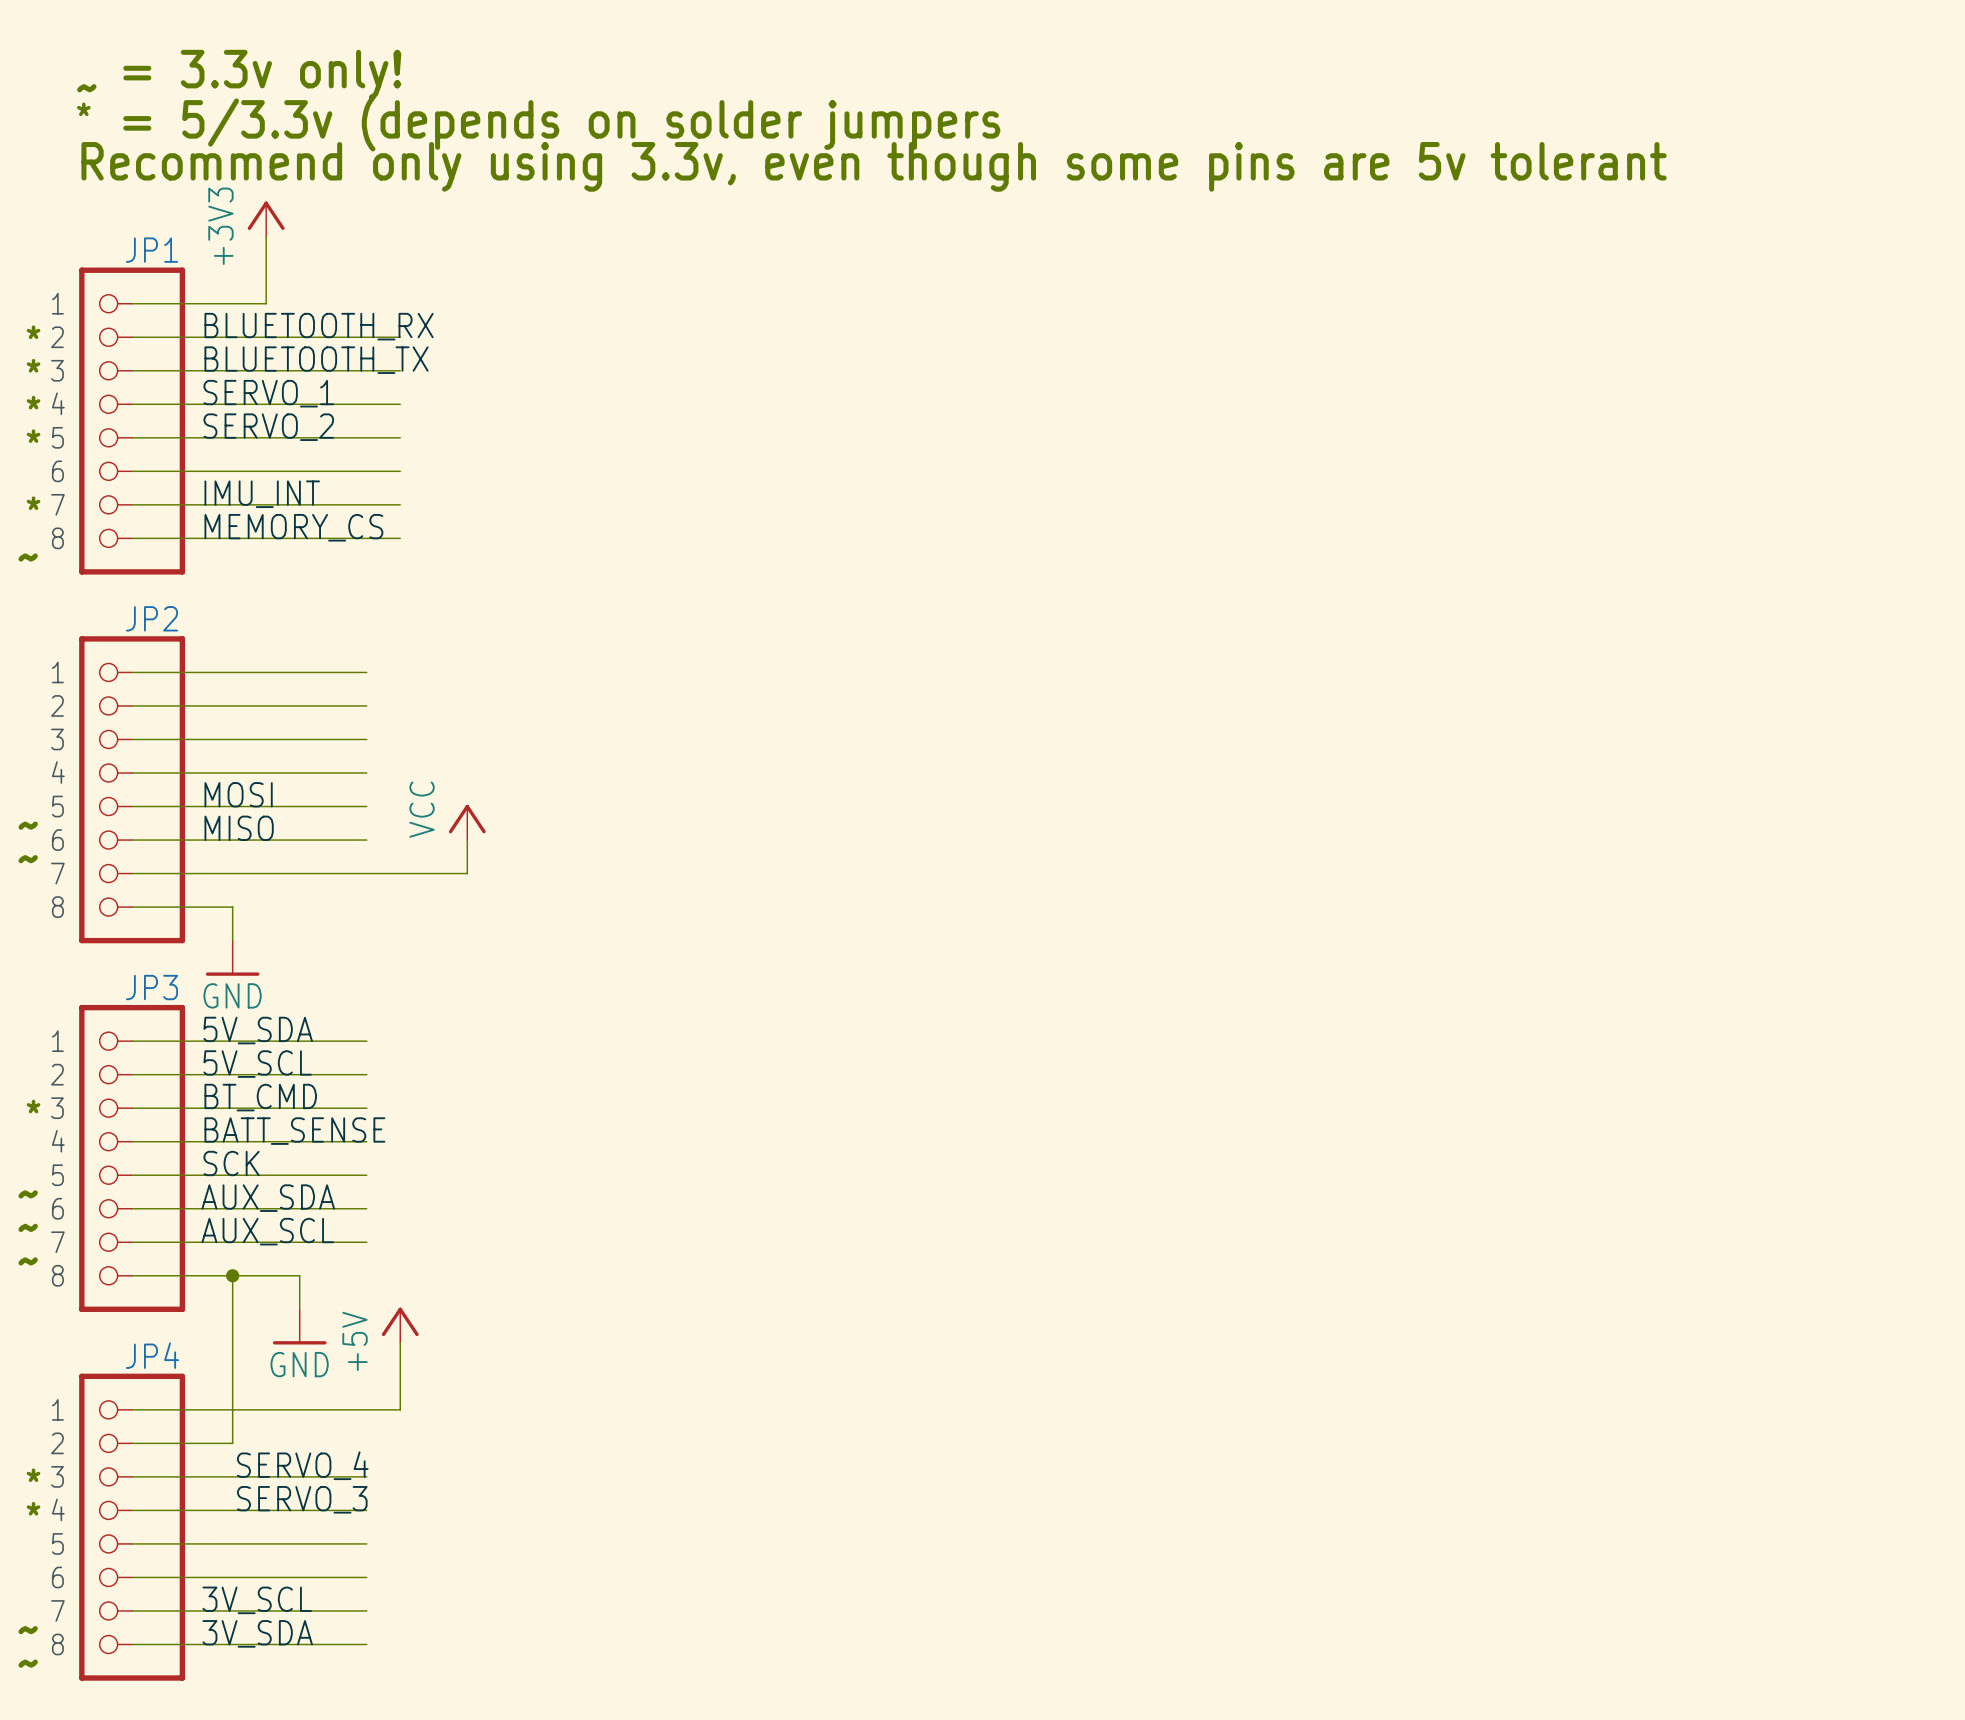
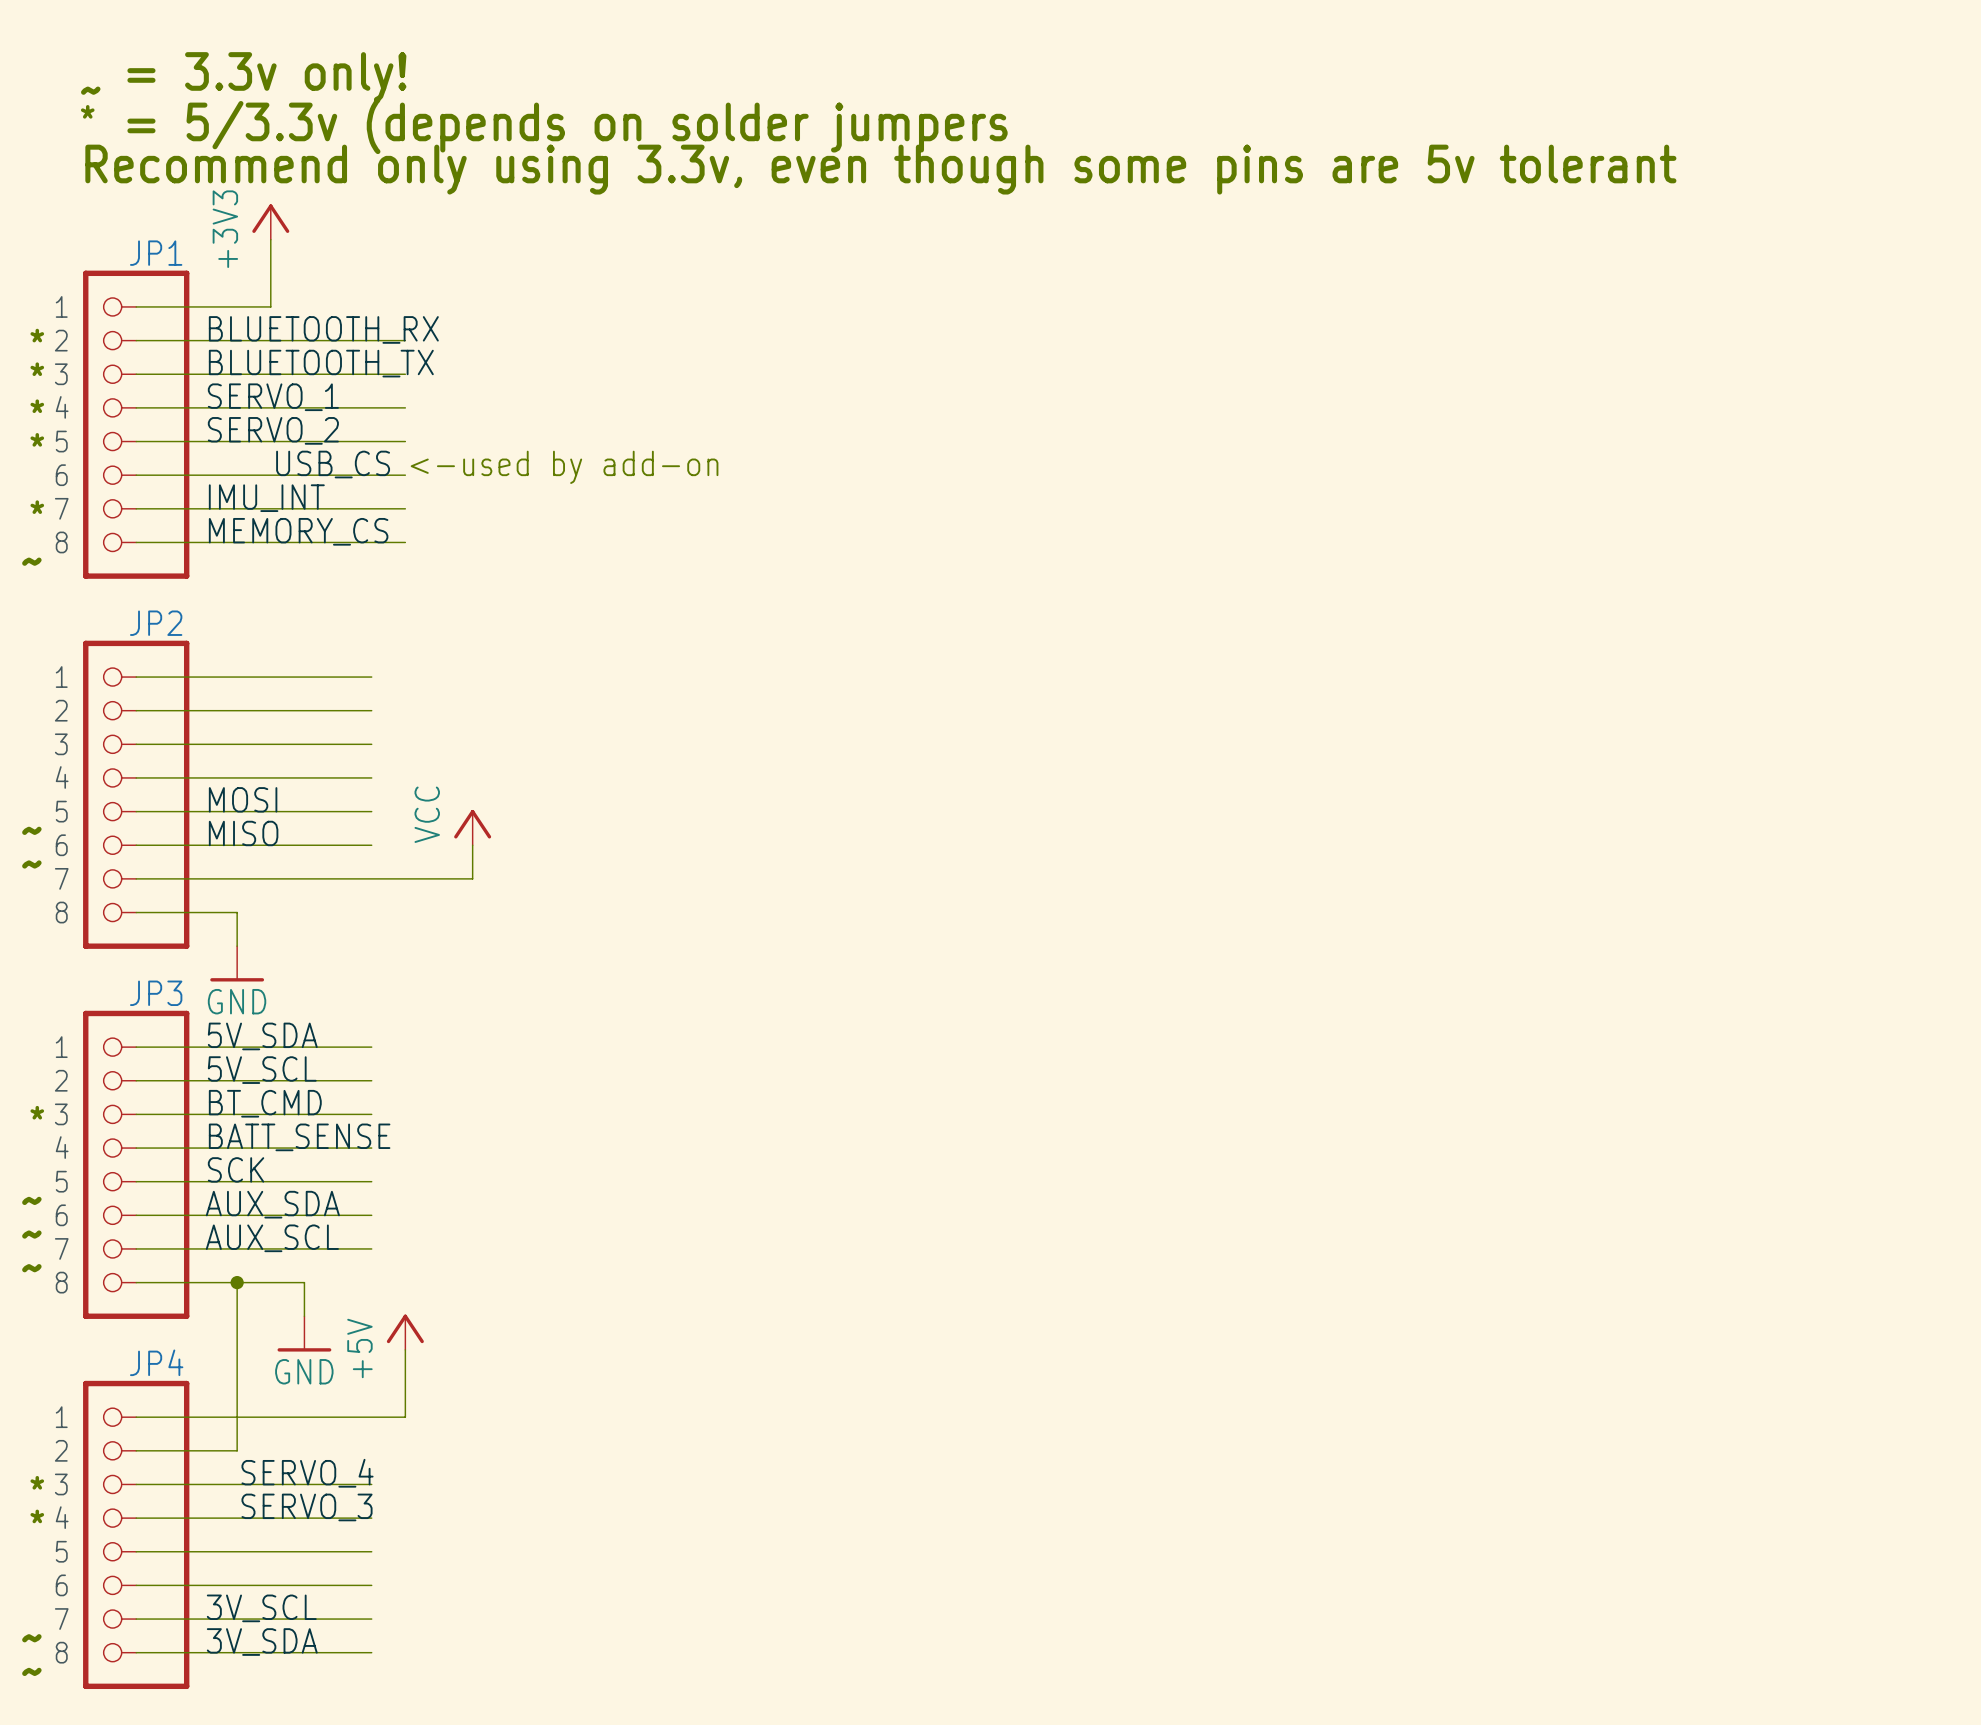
label: none -> USB_CS (333, 464)
text: none -> <-used by add-on (564, 467)

